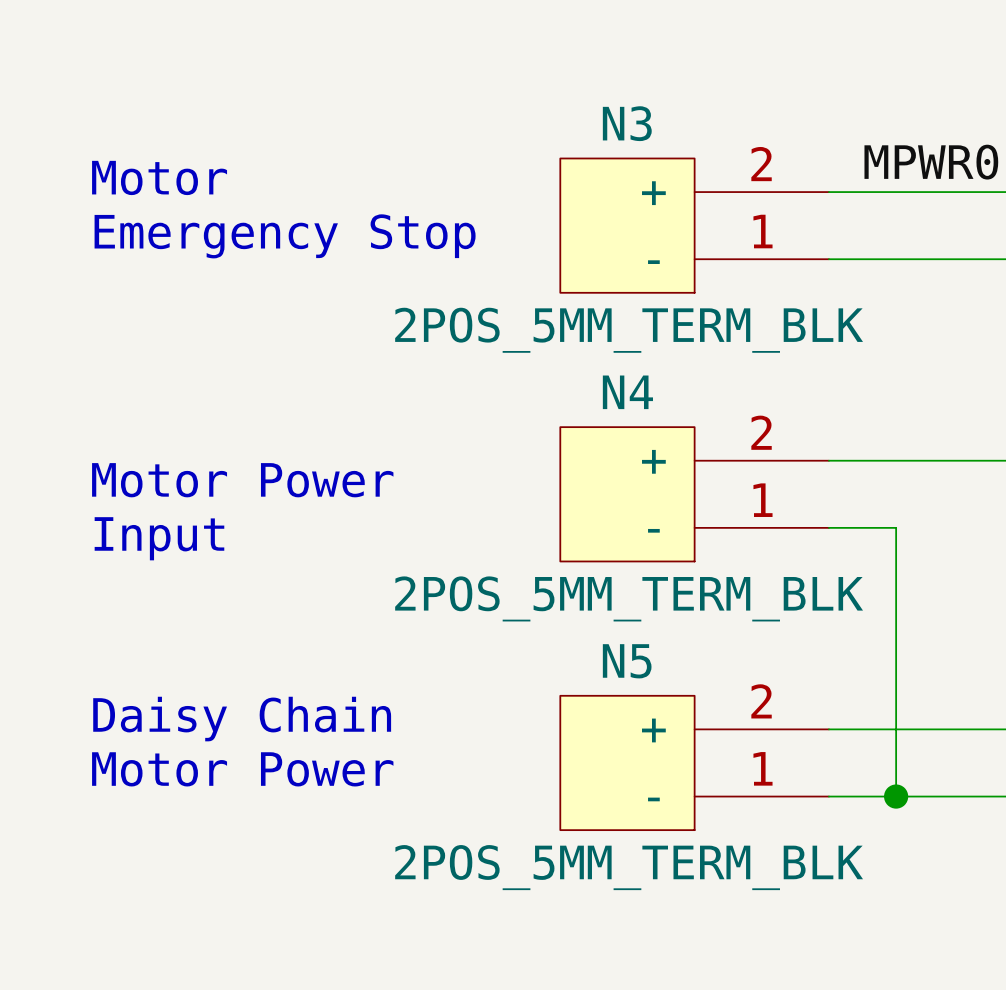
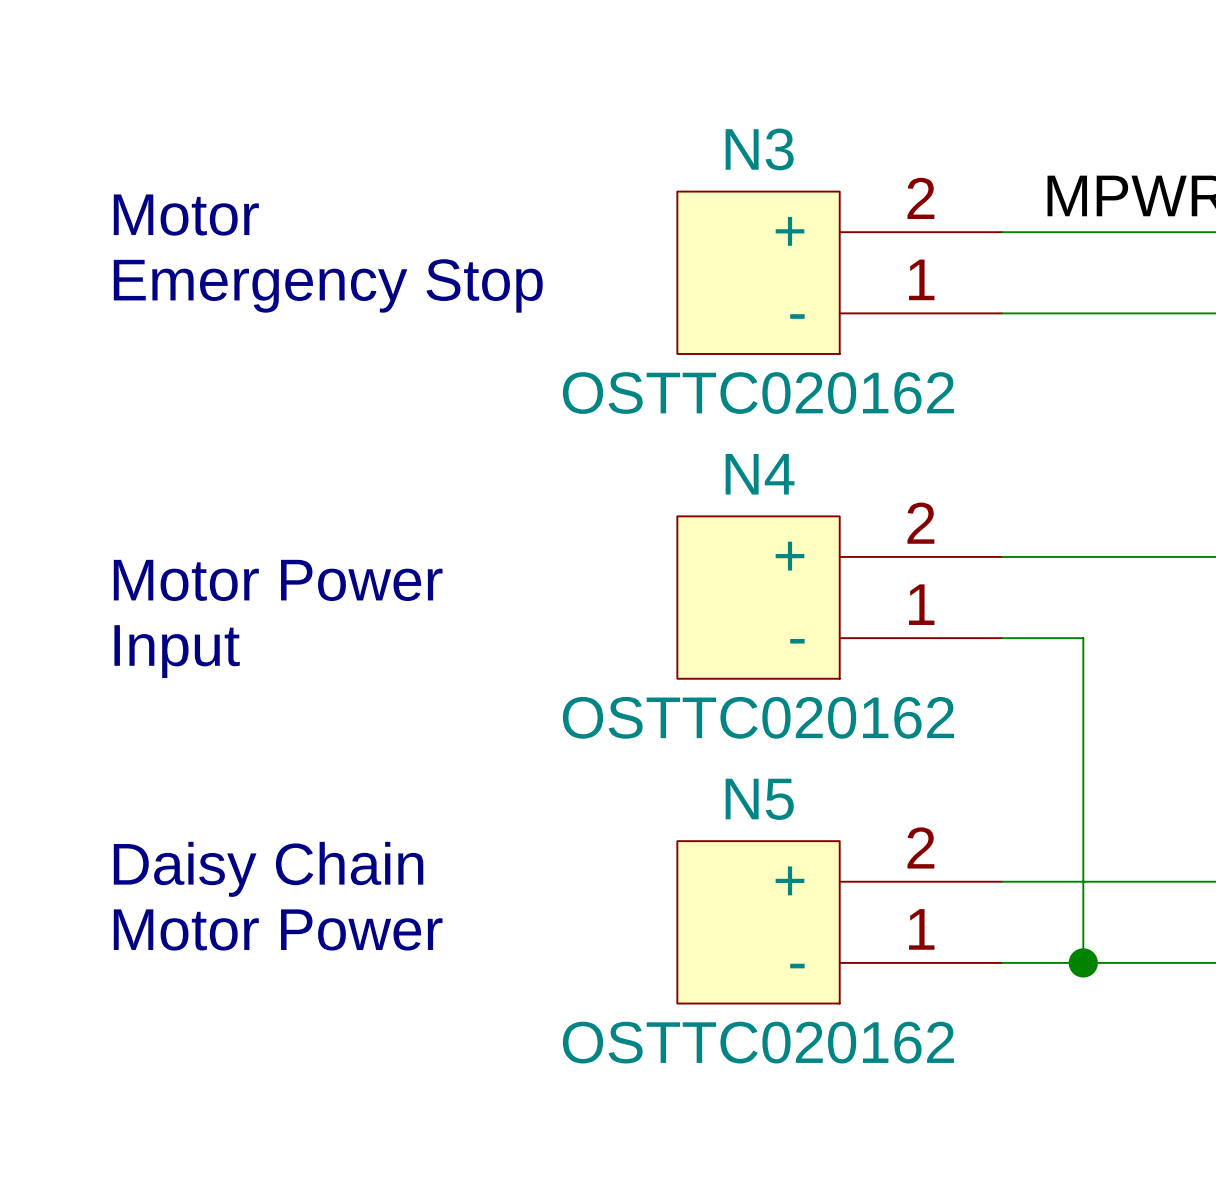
N3 value: 2POS_5MM_TERM_BLK (629, 330) -> OSTTC020162 (758, 393)
N4 value: 2POS_5MM_TERM_BLK (629, 598) -> OSTTC020162 (758, 717)
N5 value: 2POS_5MM_TERM_BLK (629, 867) -> OSTTC020162 (758, 1042)

